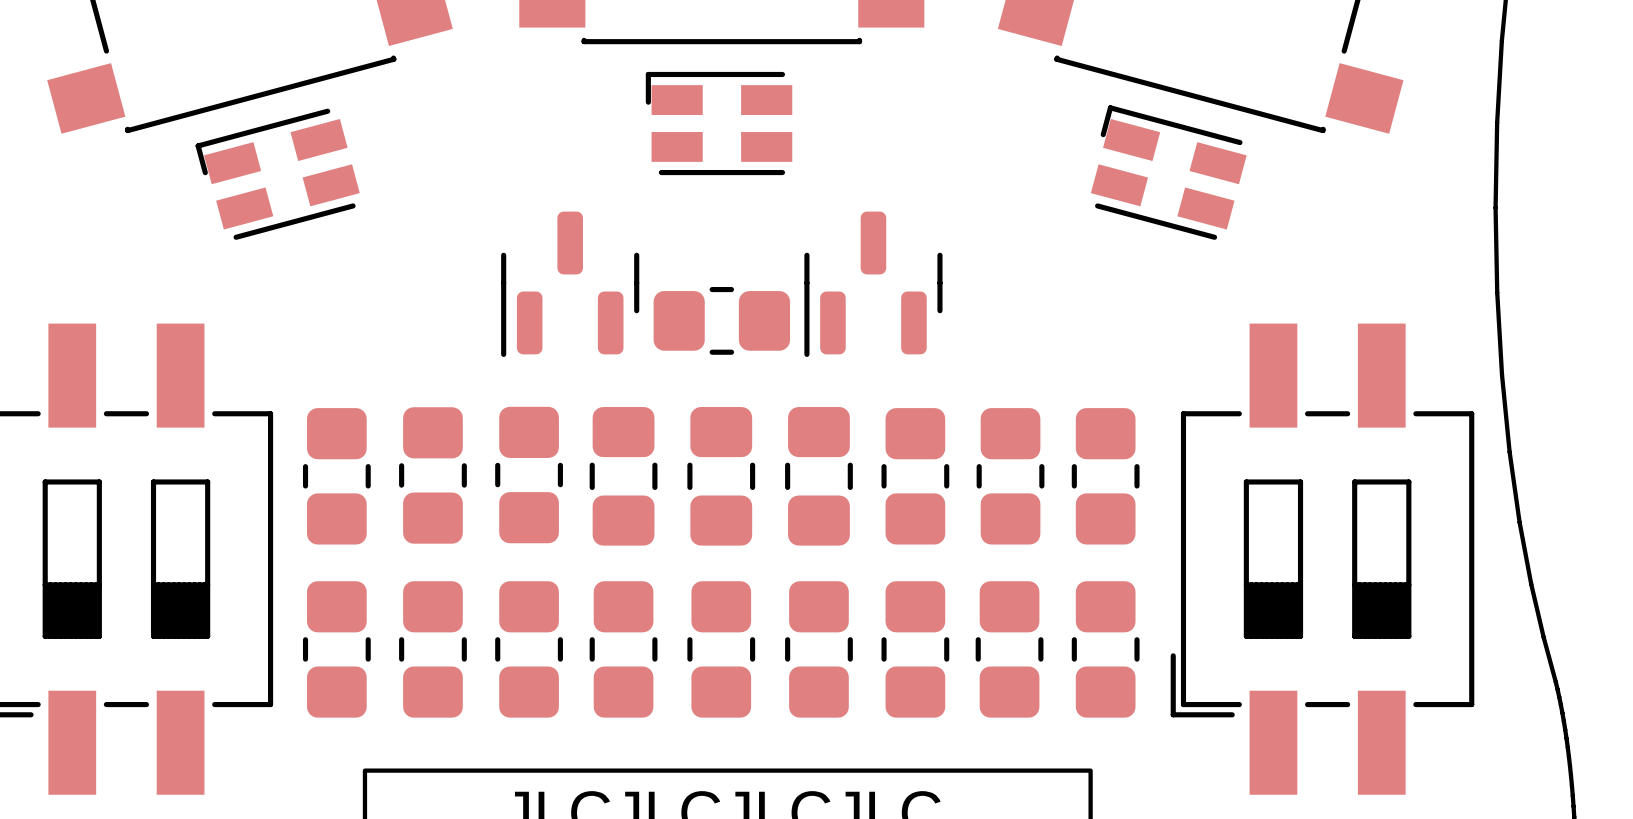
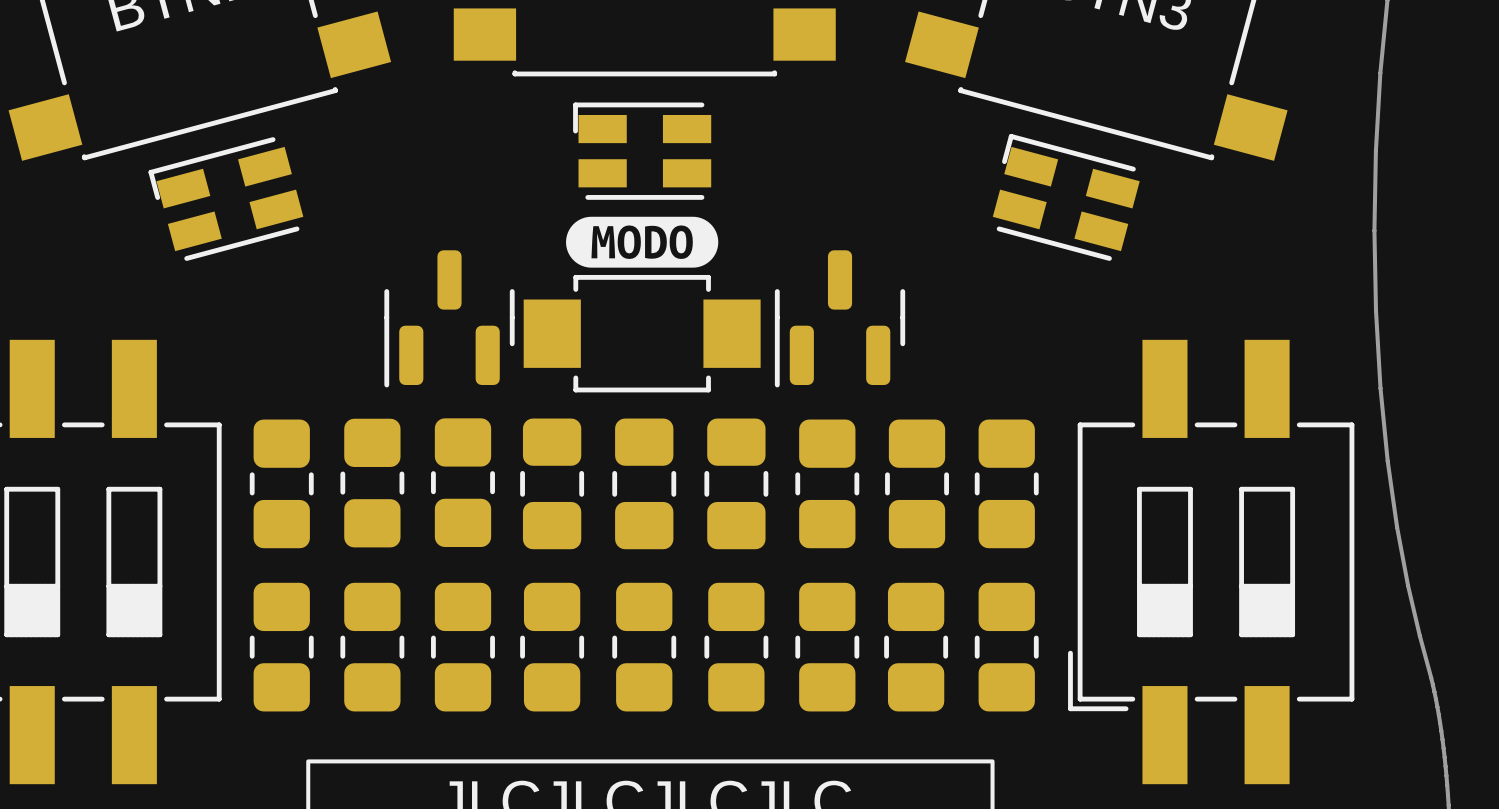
drawing: none -> [566, 216, 719, 268]
part position: (570, 284) -> (449, 318)
part position: (873, 284) -> (840, 318)
part footprint: [653, 286, 791, 355] -> [523, 274, 761, 393]

